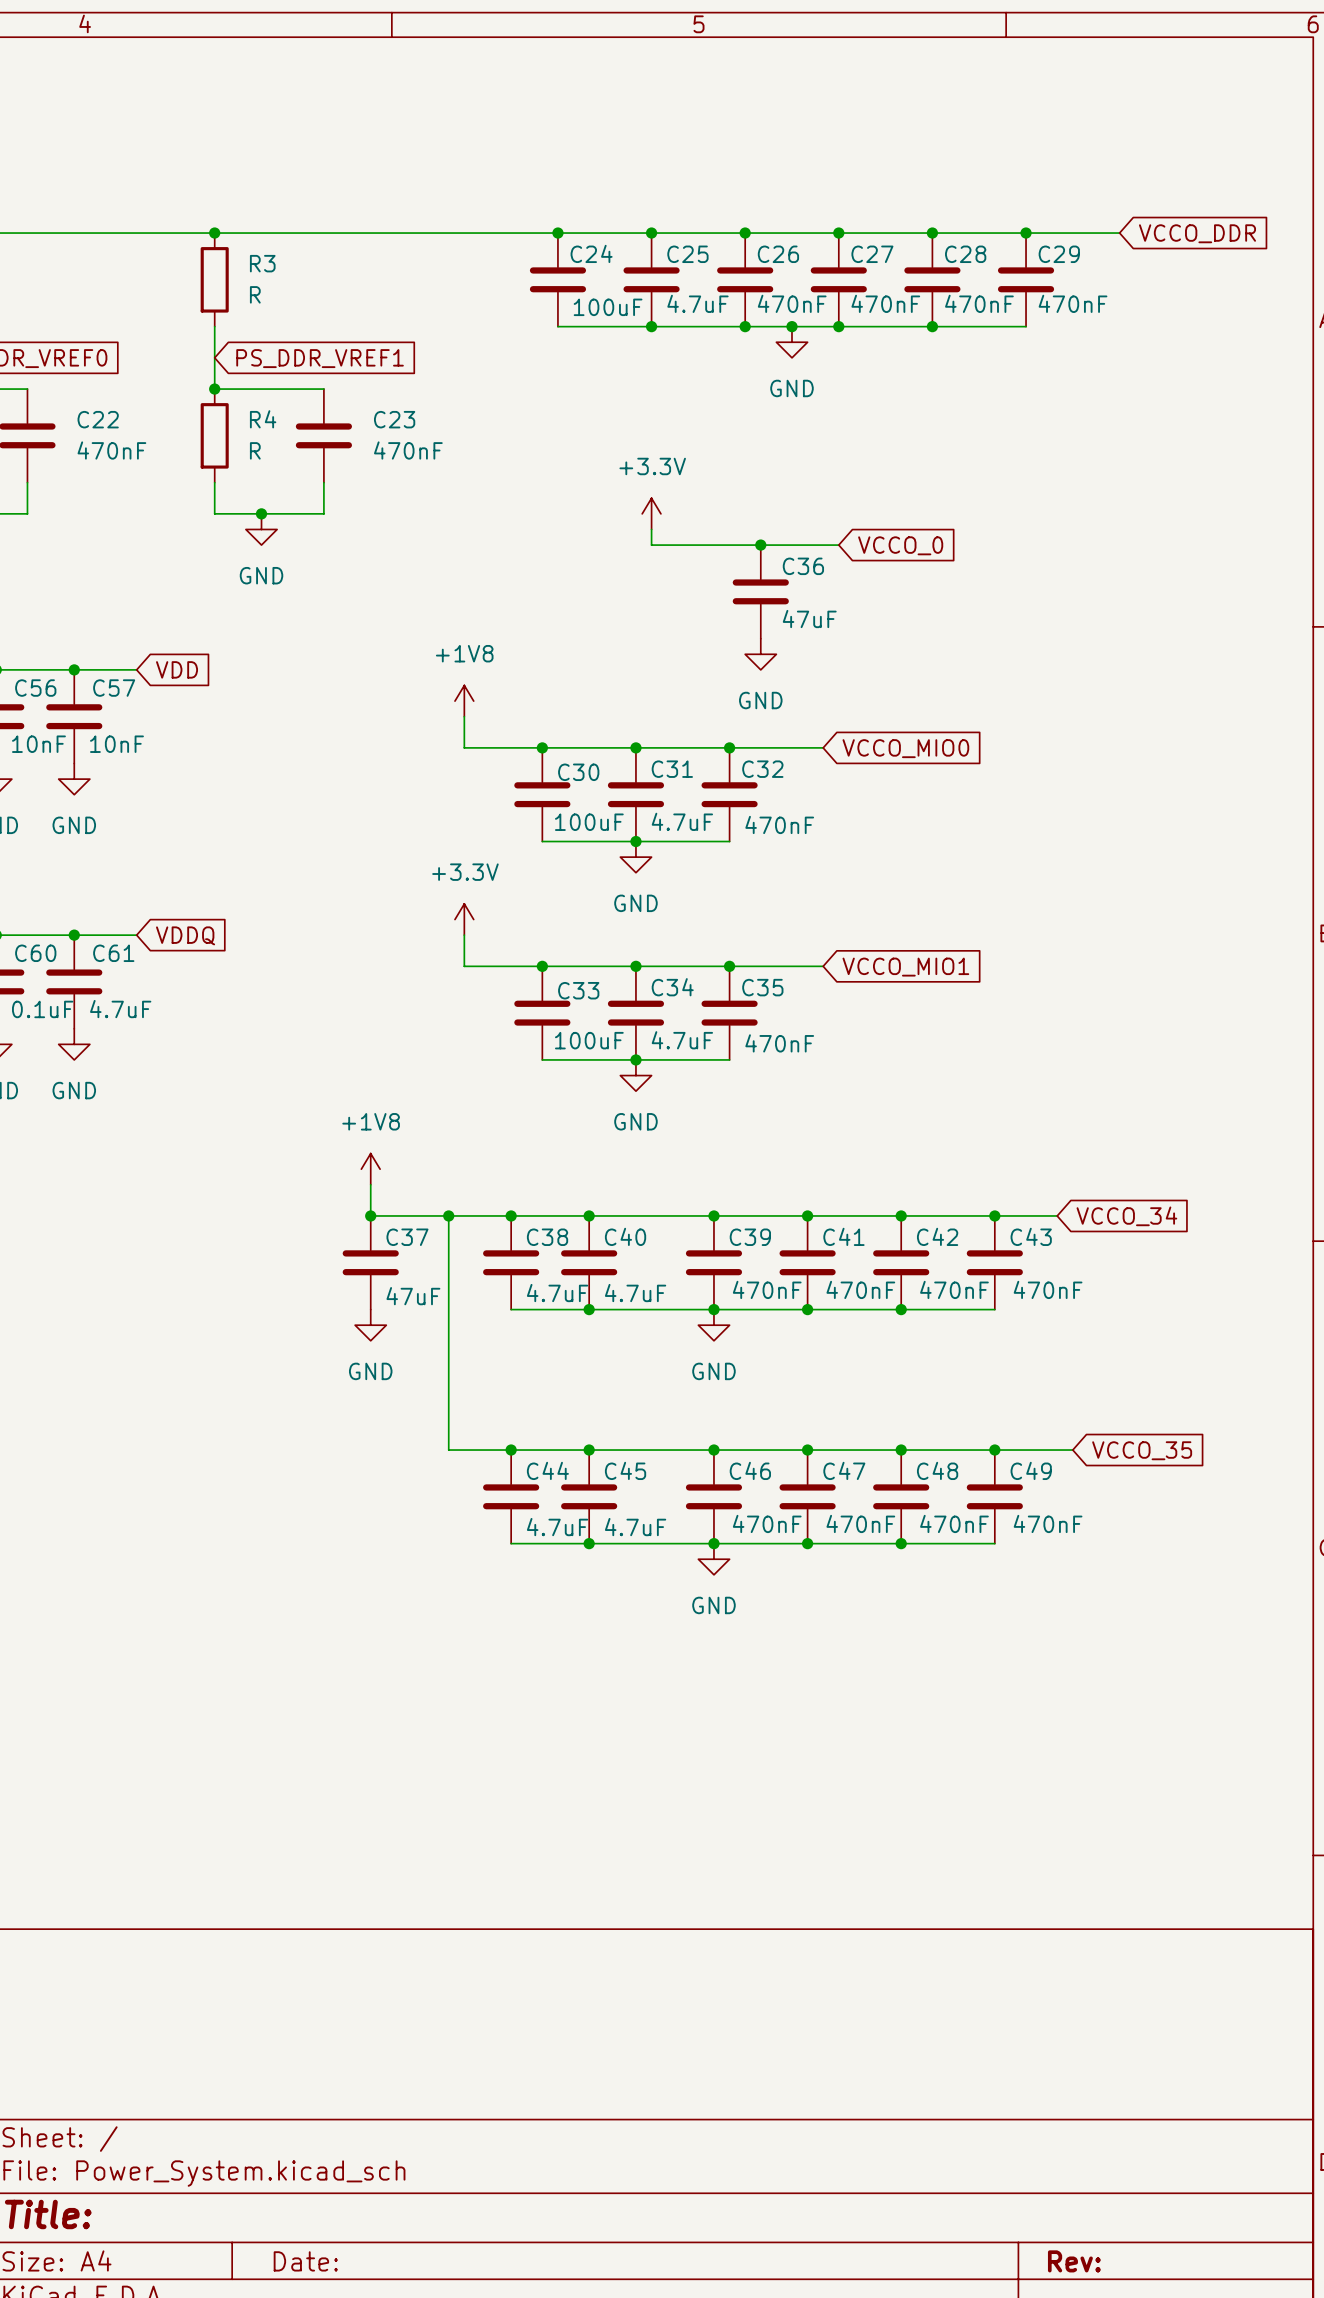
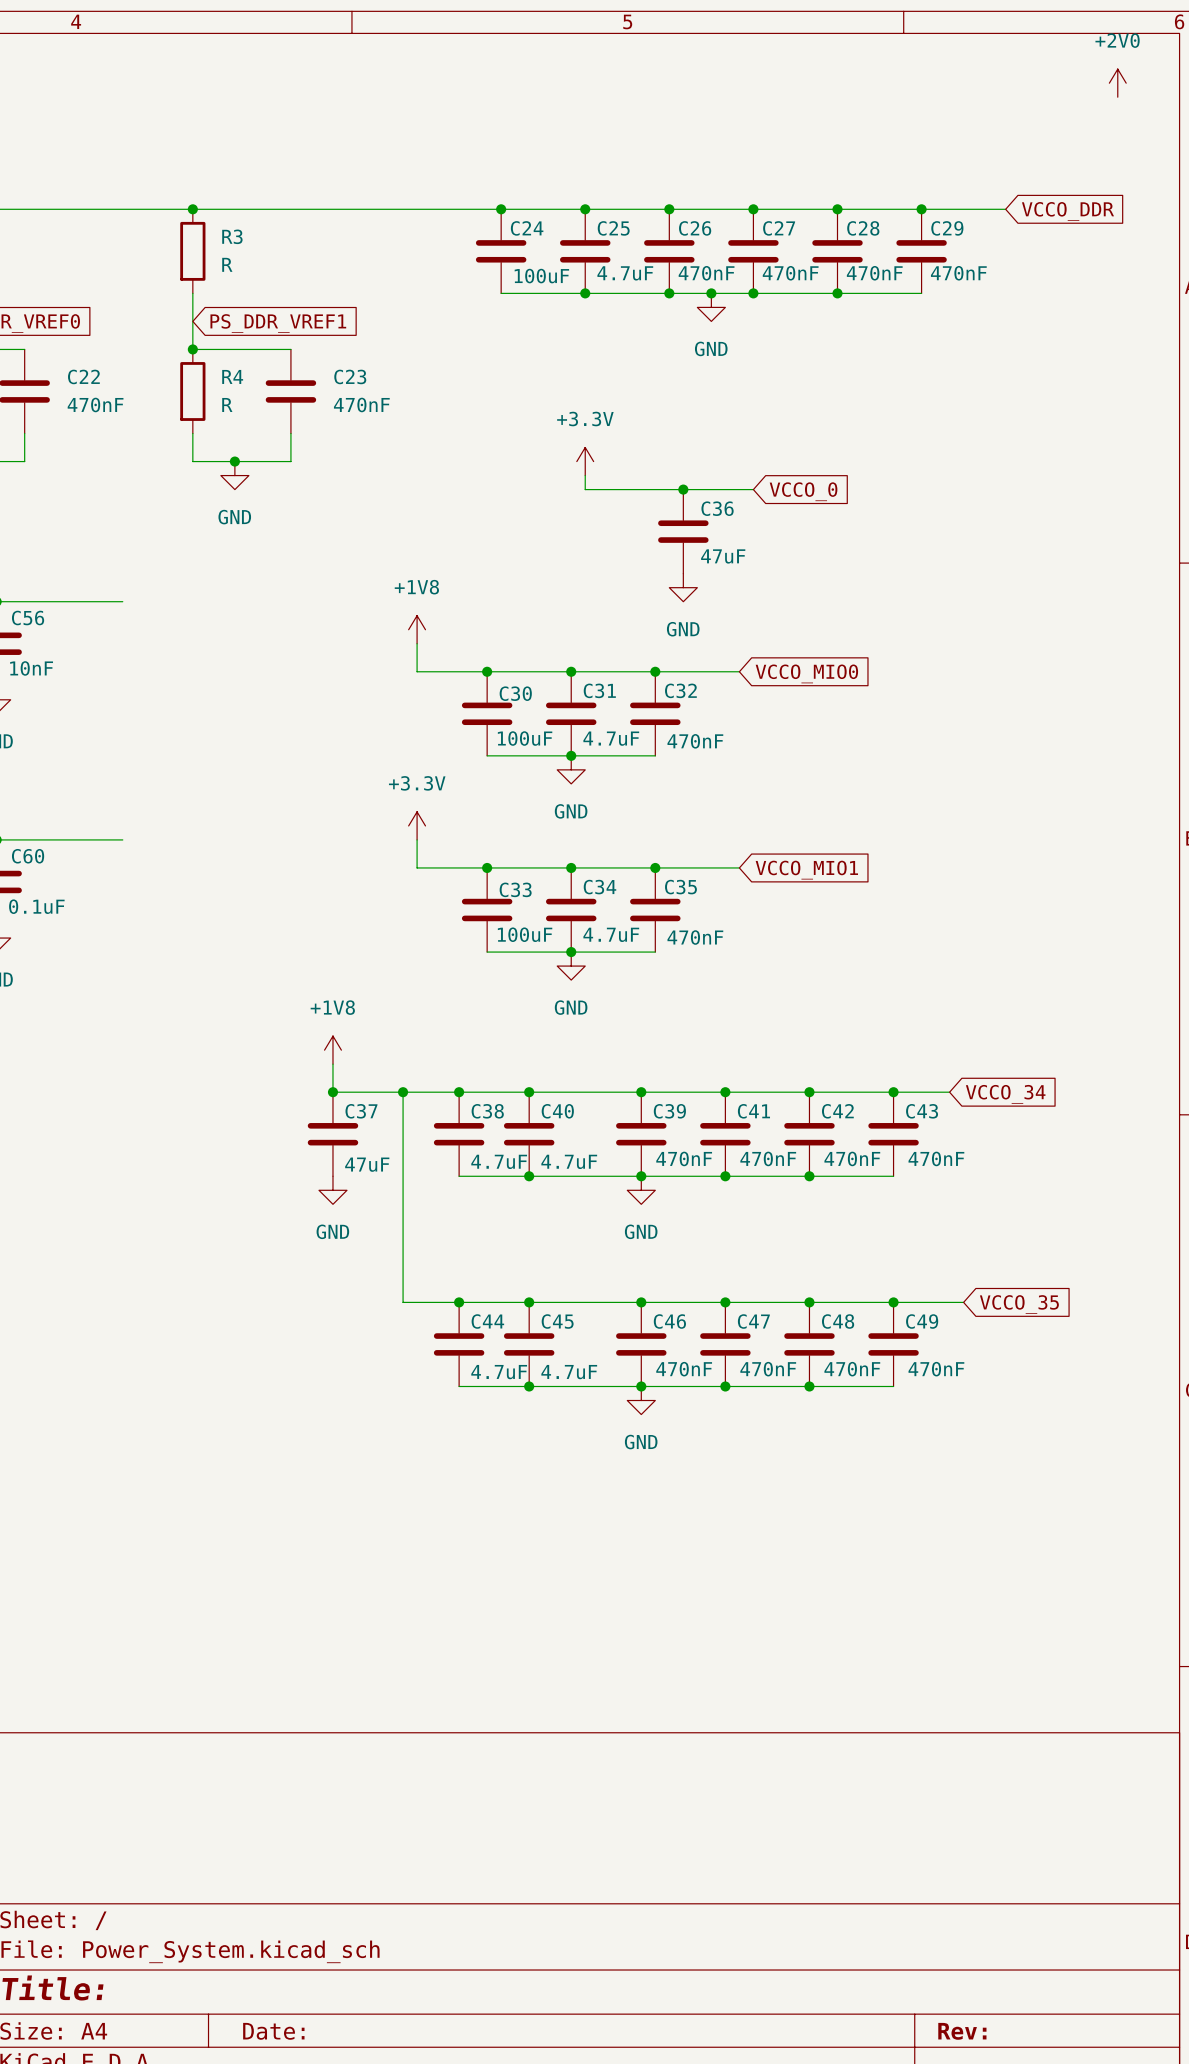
power symbol: none -> +2V0 (1117, 83)
junction: (74, 669) -> none
global label: VDD (177, 669) -> none
C57: 10nF (74, 716) -> none
power symbol: GND (74, 779) -> none
junction: (74, 935) -> none
global label: VDDQ (185, 935) -> none
C61: 4.7uF (74, 981) -> none
power symbol: GND (74, 1044) -> none

